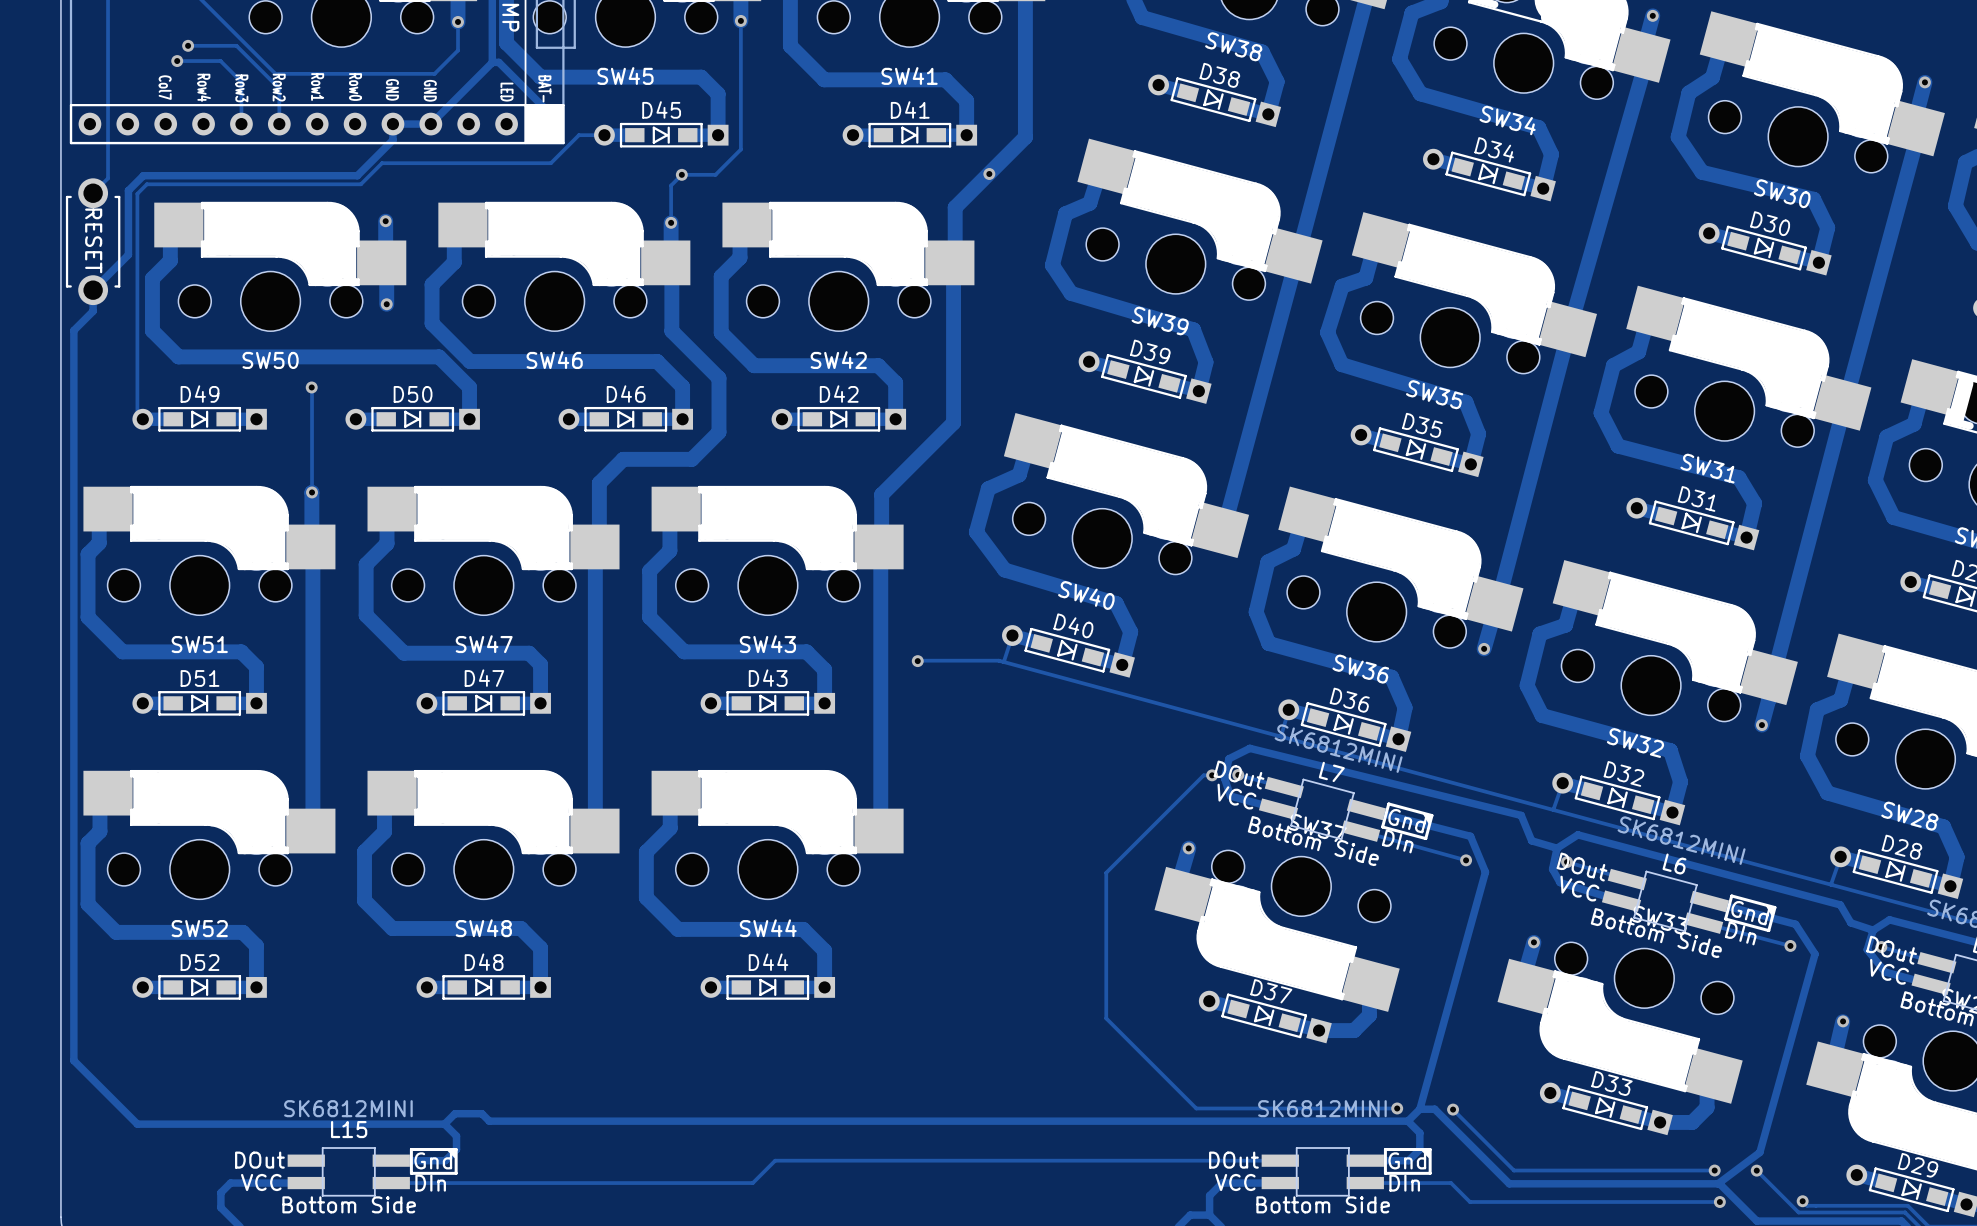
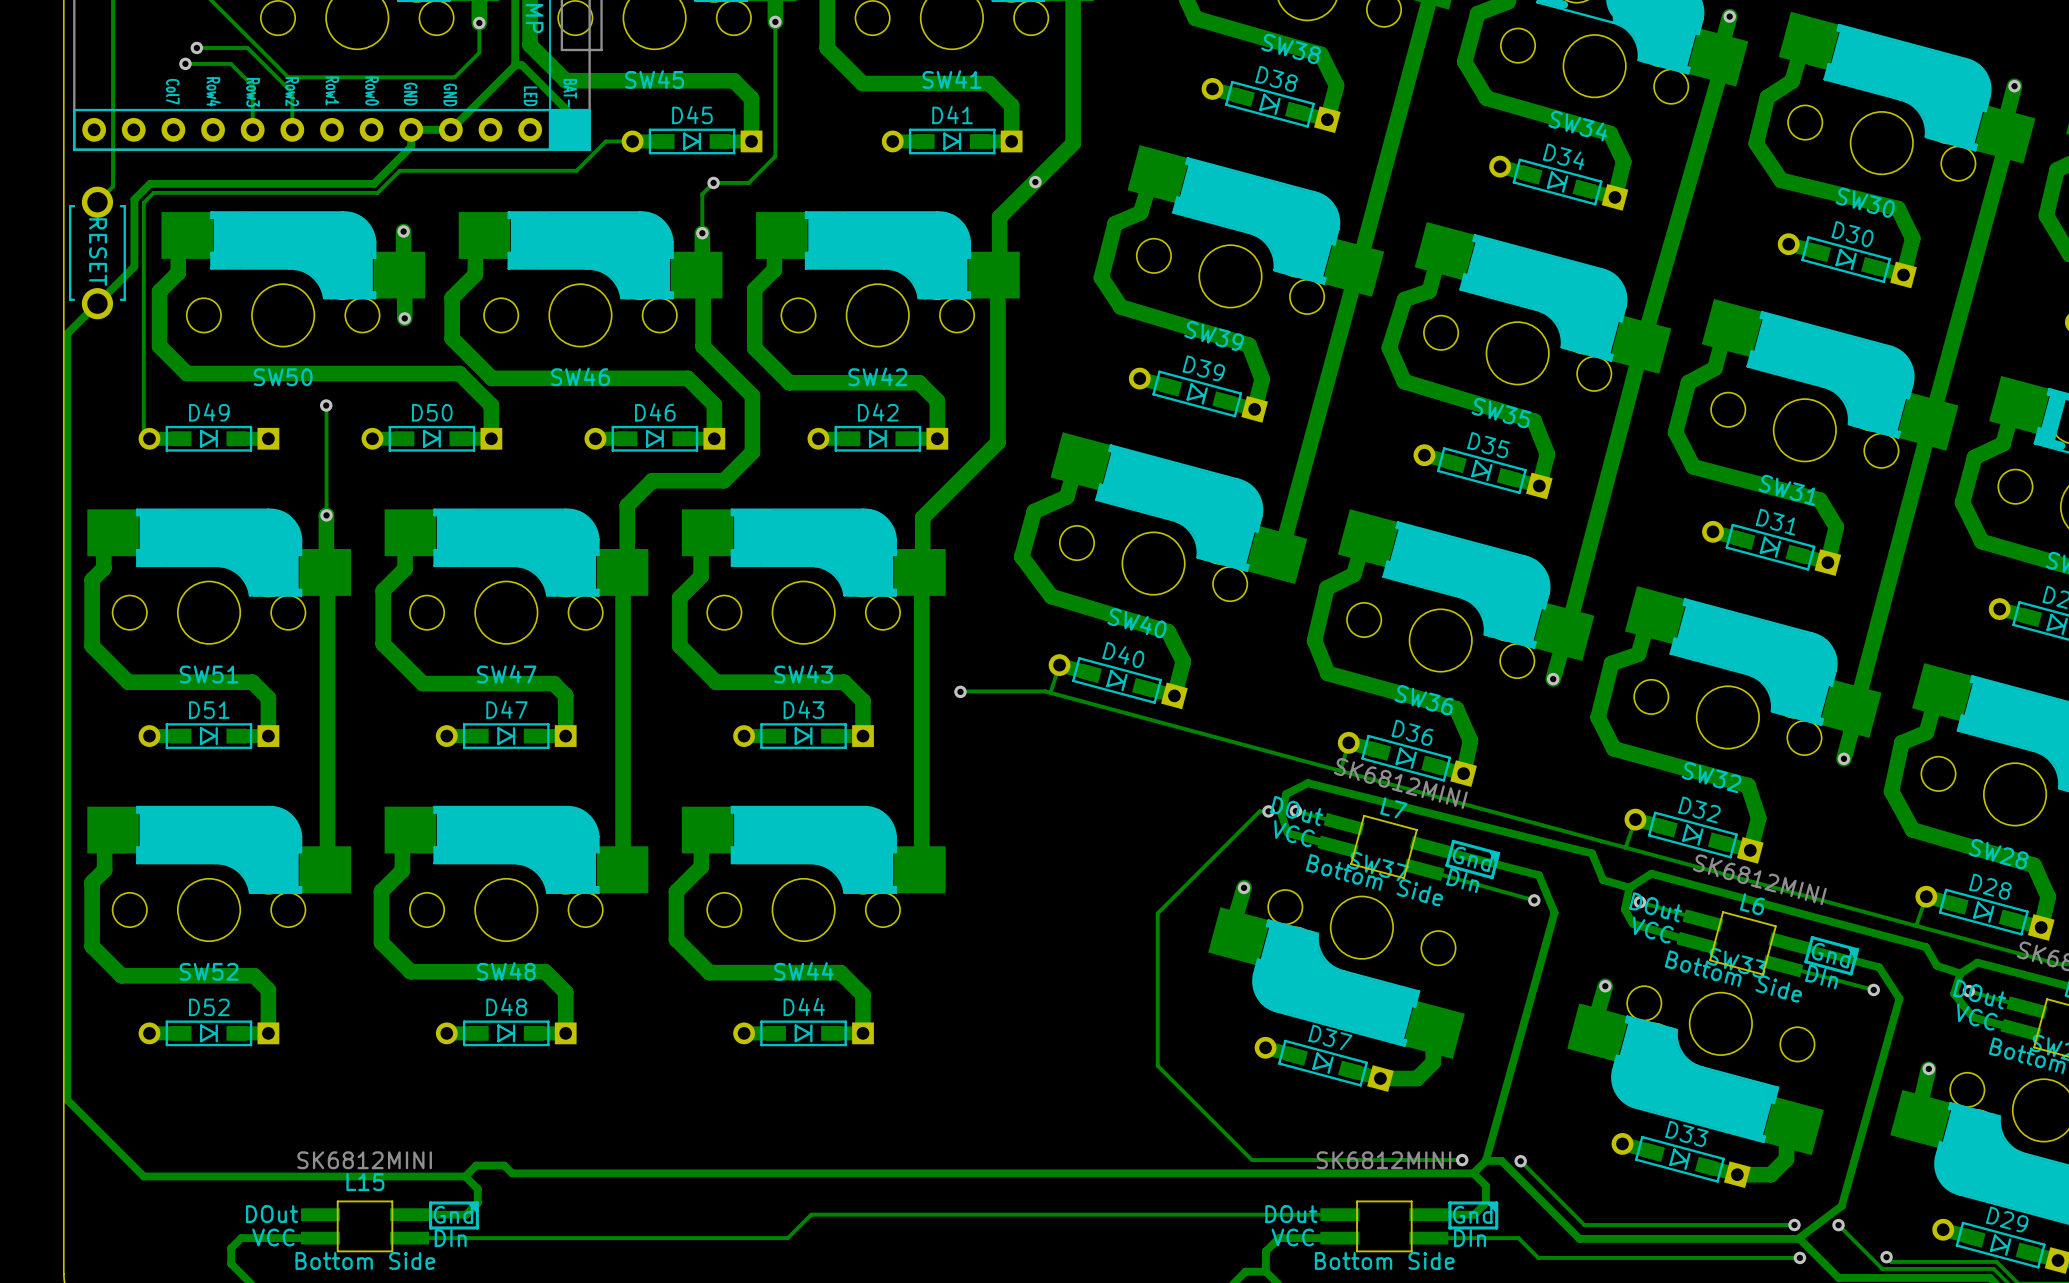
track: (93, 290) (93, 311) (73, 330) (73, 1060) -> (97, 303) (67, 333) (67, 1099) (77, 1109)

